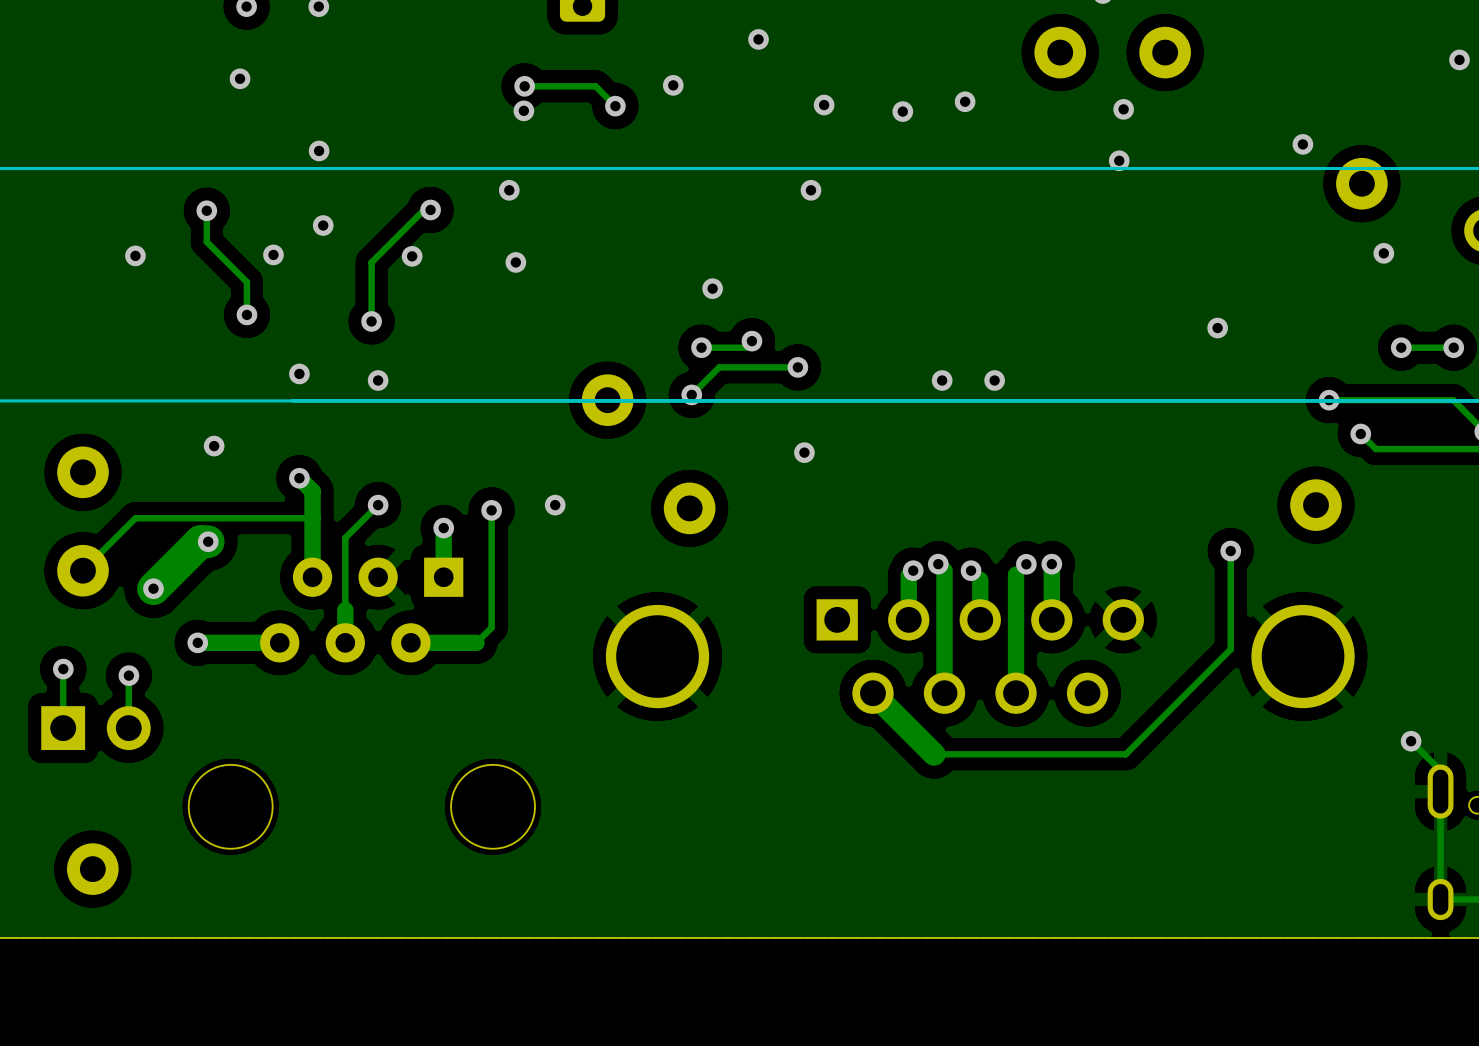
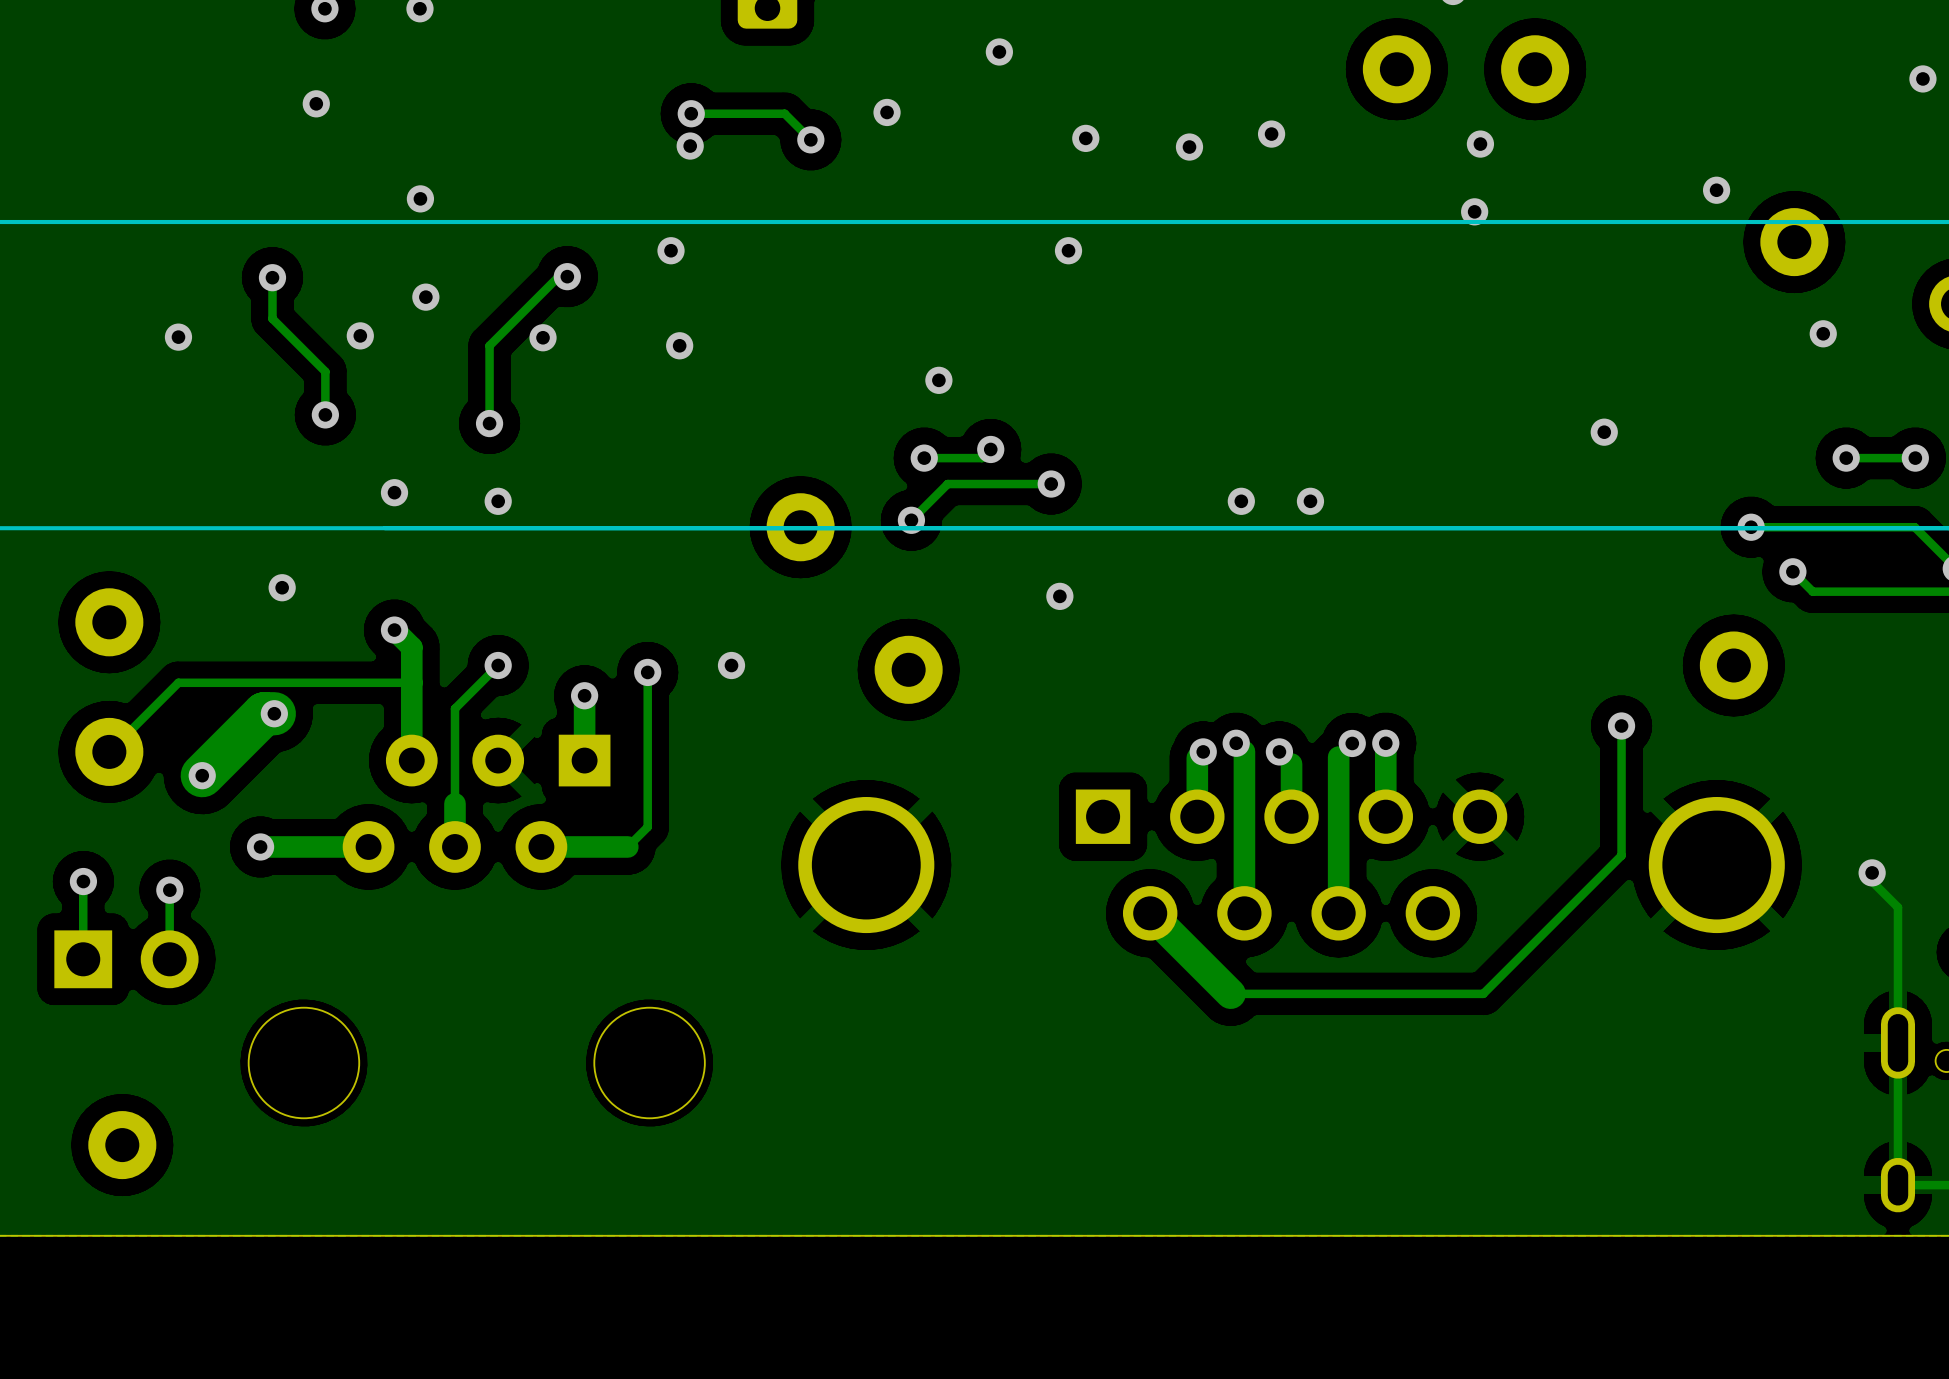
via: none -> (1872, 872)
track: (1411, 741) (1440, 770) -> (1872, 872) (1872, 881) (1897, 907) (1897, 1015)
via: (1411, 741) -> none

